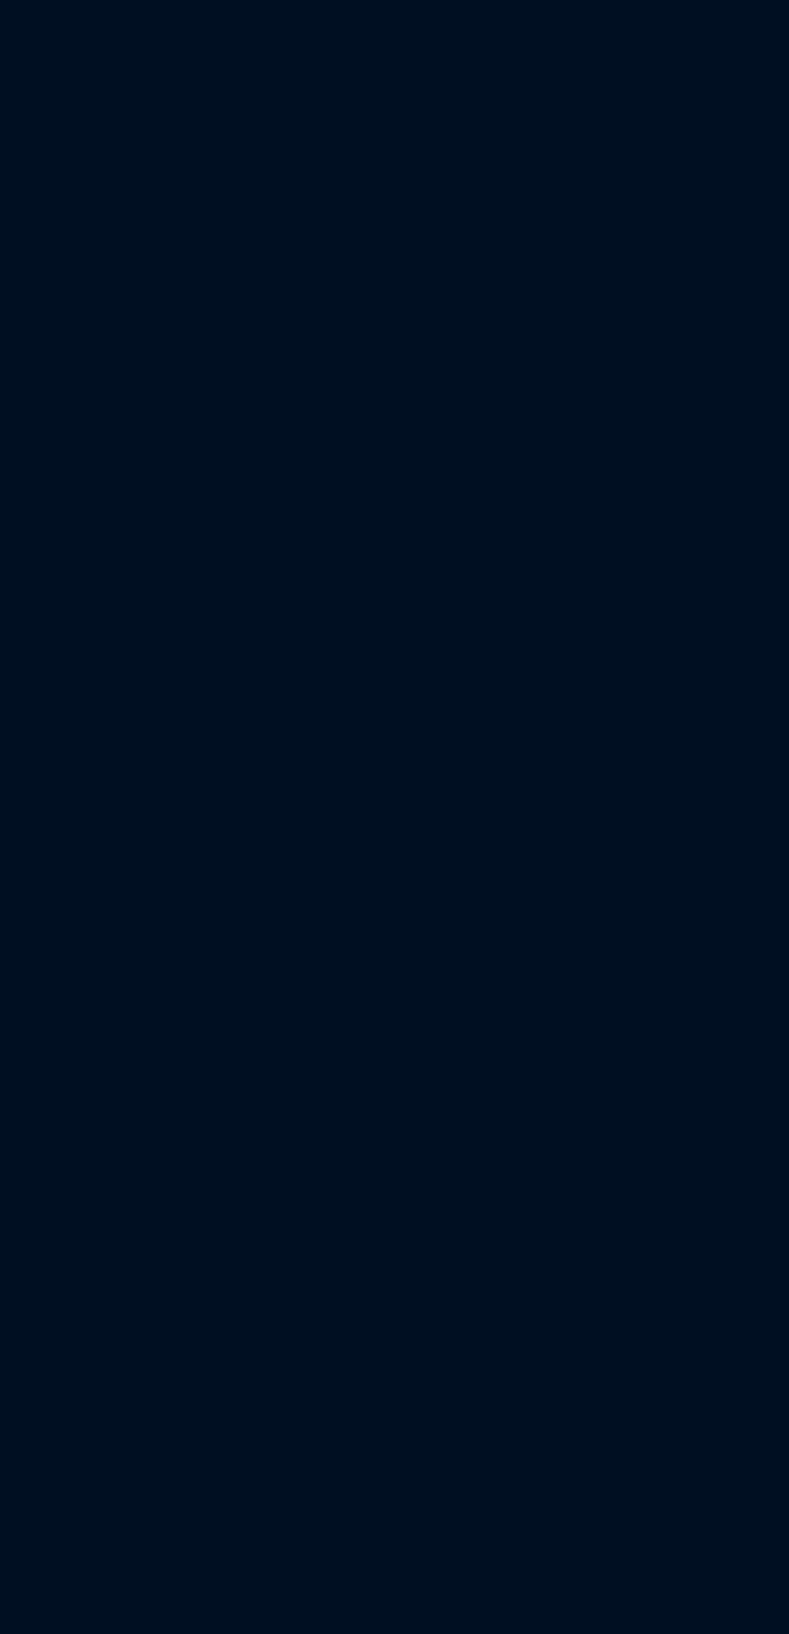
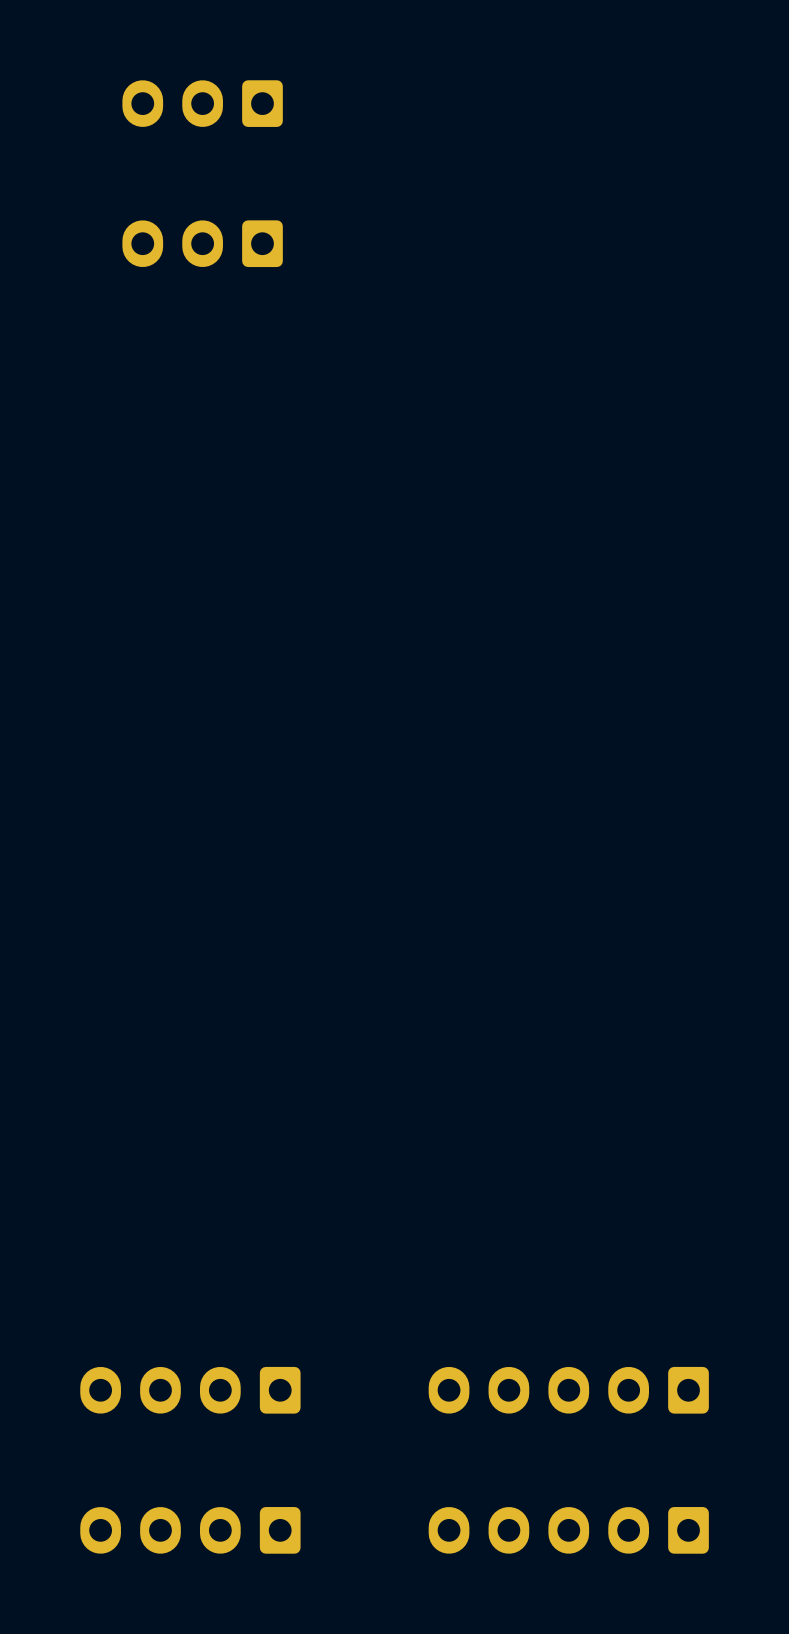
part: none -> (202, 103)
part: none -> (202, 243)
part: none -> (190, 1390)
part: none -> (568, 1390)
part: none -> (190, 1530)
part: none -> (568, 1530)

